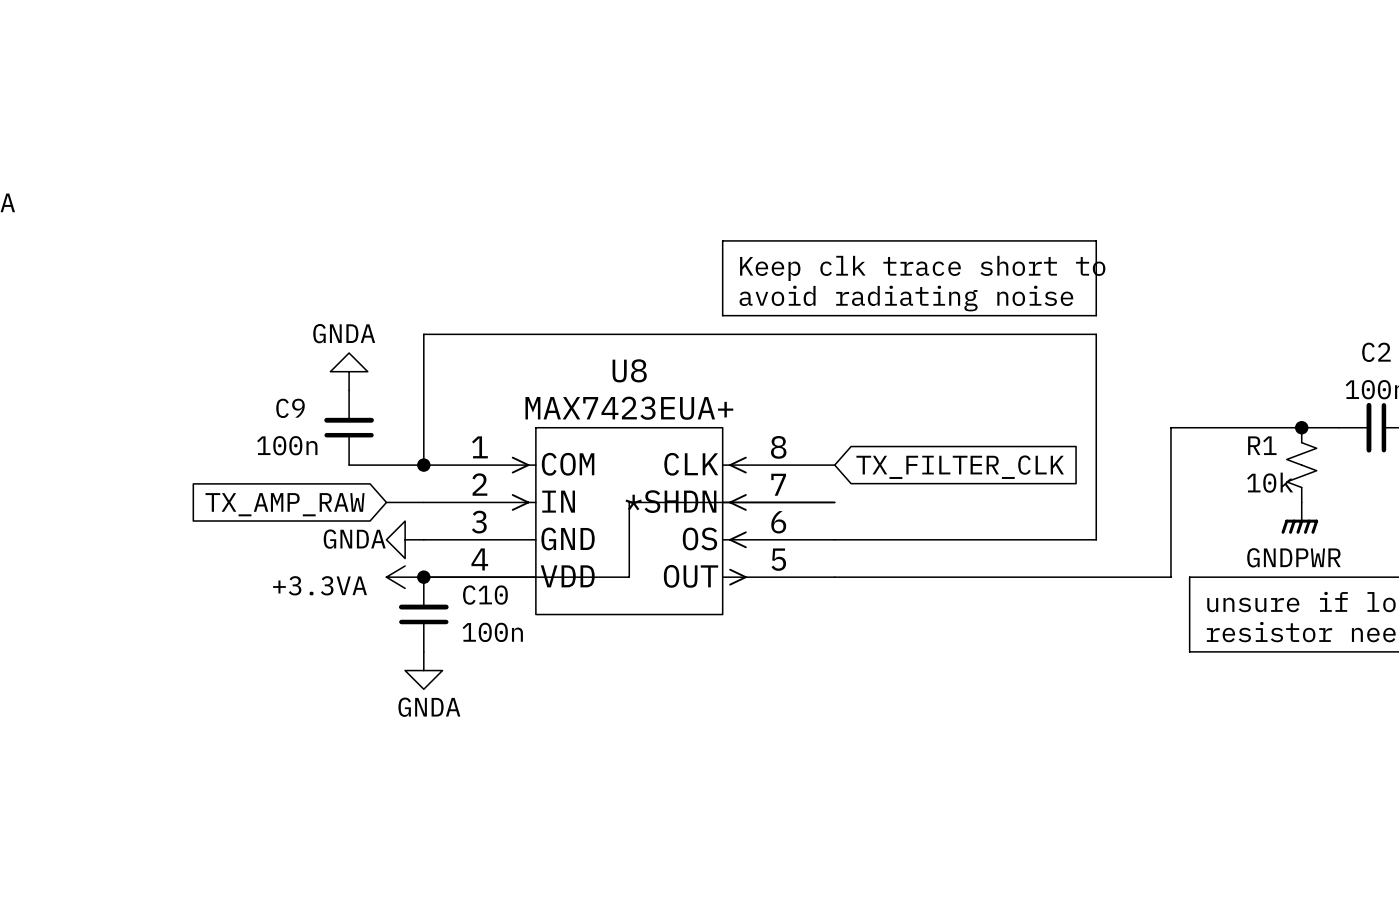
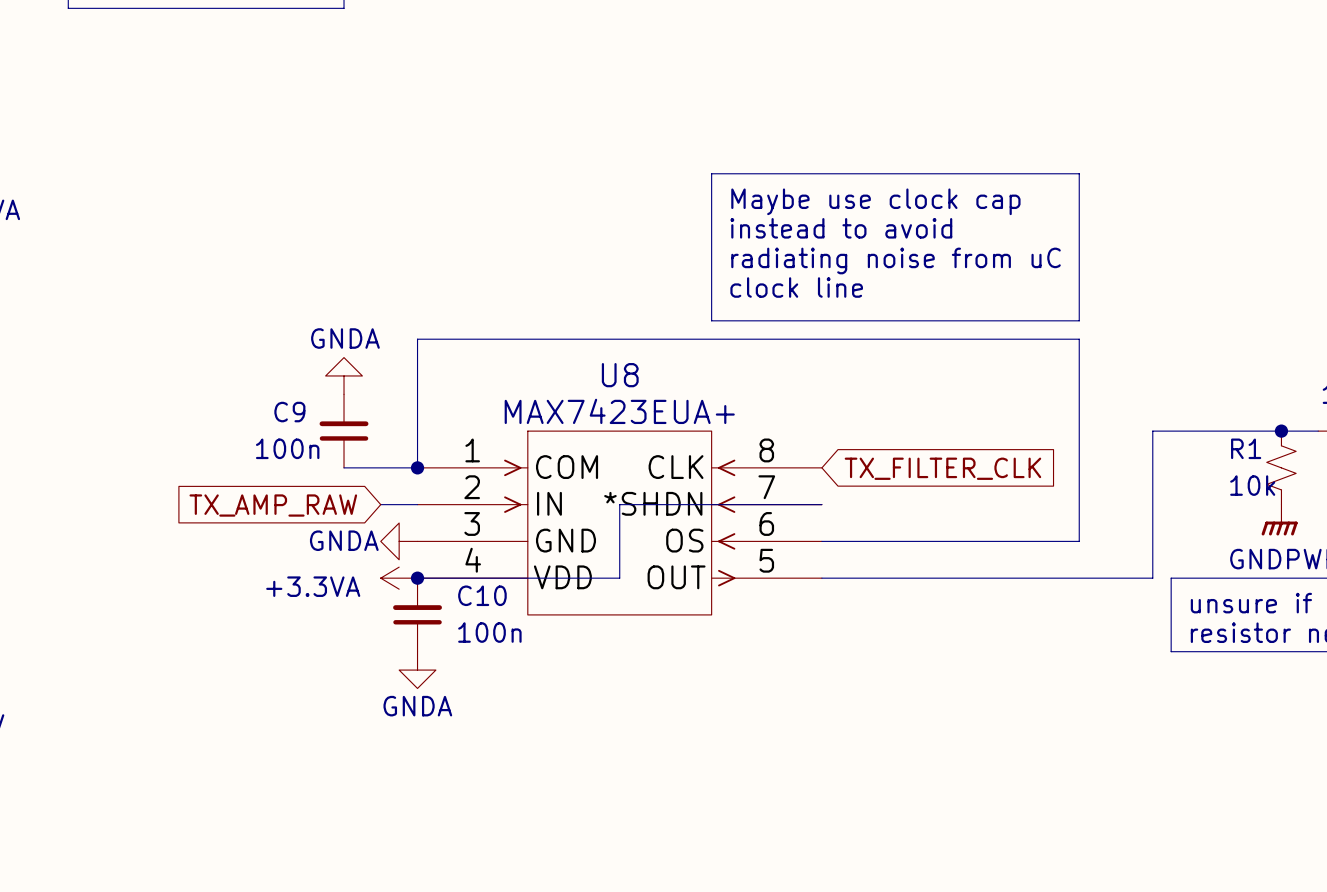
text: none -> Maybe use clock cap (875, 201)
text: none -> instead to avoid (841, 228)
line: (722, 240) (1096, 240) -> (711, 247) (711, 173) (1079, 173) (1079, 247)
text: none -> radiating noise from uC (896, 260)
text: Keep clk trace short to (922, 268) -> none
text: none -> clock line (796, 287)
text: avoid radiating noise (906, 298) -> none

